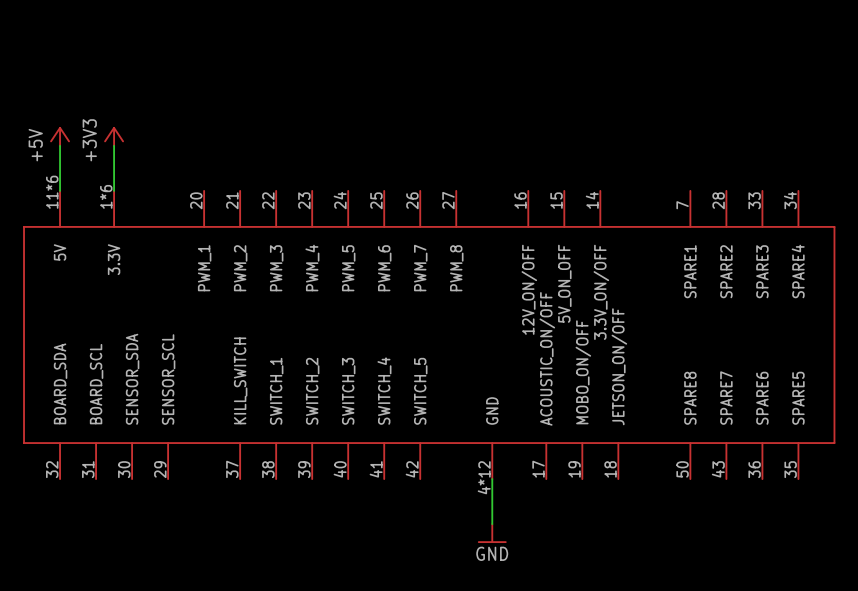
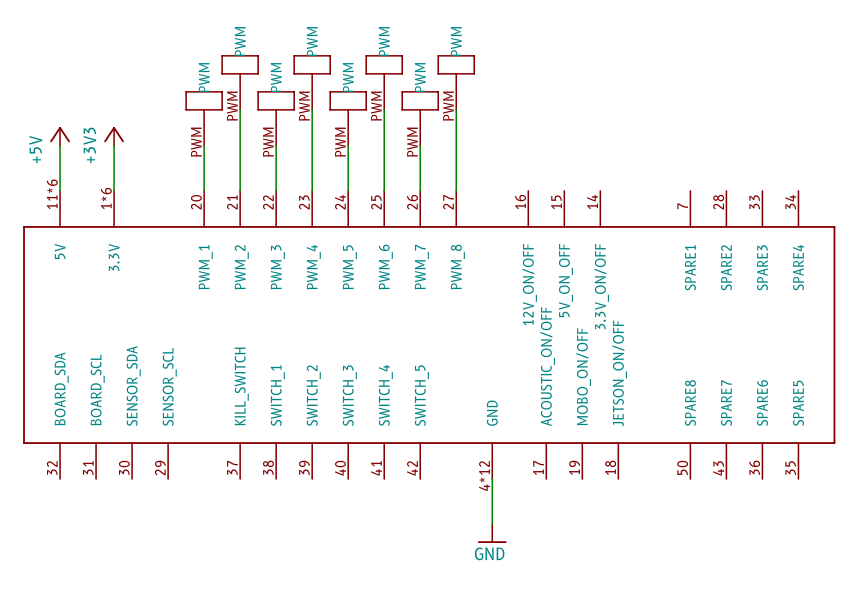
part: none -> (240, 82)
part: none -> (312, 82)
part: none -> (384, 82)
part: none -> (456, 82)
wire: none -> (240, 109) (240, 190)
wire: none -> (312, 109) (312, 190)
wire: none -> (384, 109) (384, 190)
wire: none -> (456, 109) (456, 190)
part: none -> (204, 118)
part: none -> (276, 118)
part: none -> (348, 118)
part: none -> (420, 118)
wire: none -> (204, 145) (204, 190)
wire: none -> (276, 145) (276, 190)
wire: none -> (348, 145) (348, 190)
wire: none -> (420, 145) (420, 190)

